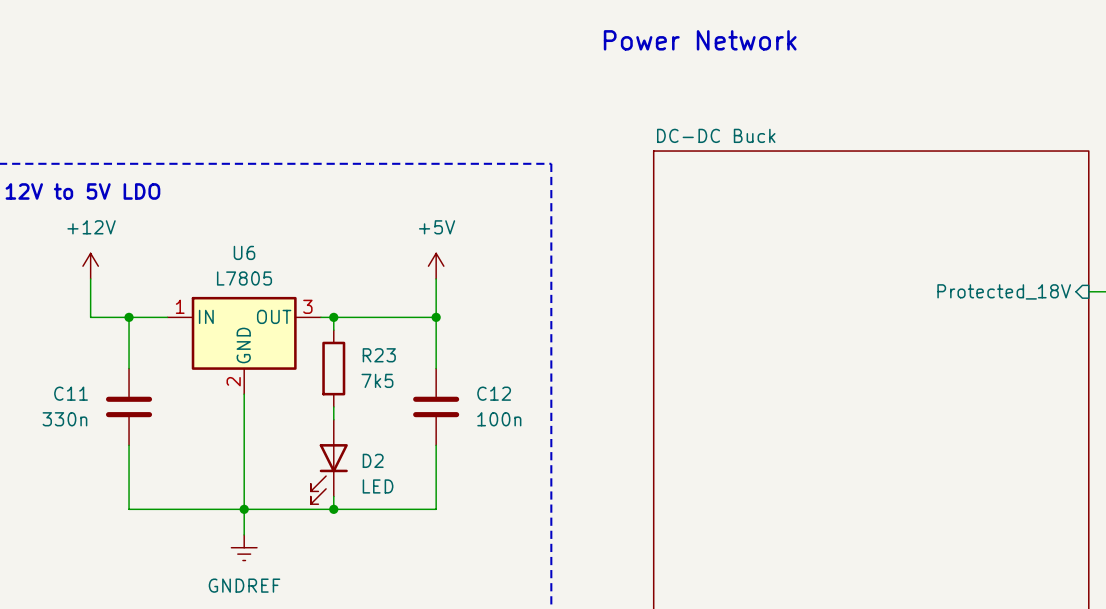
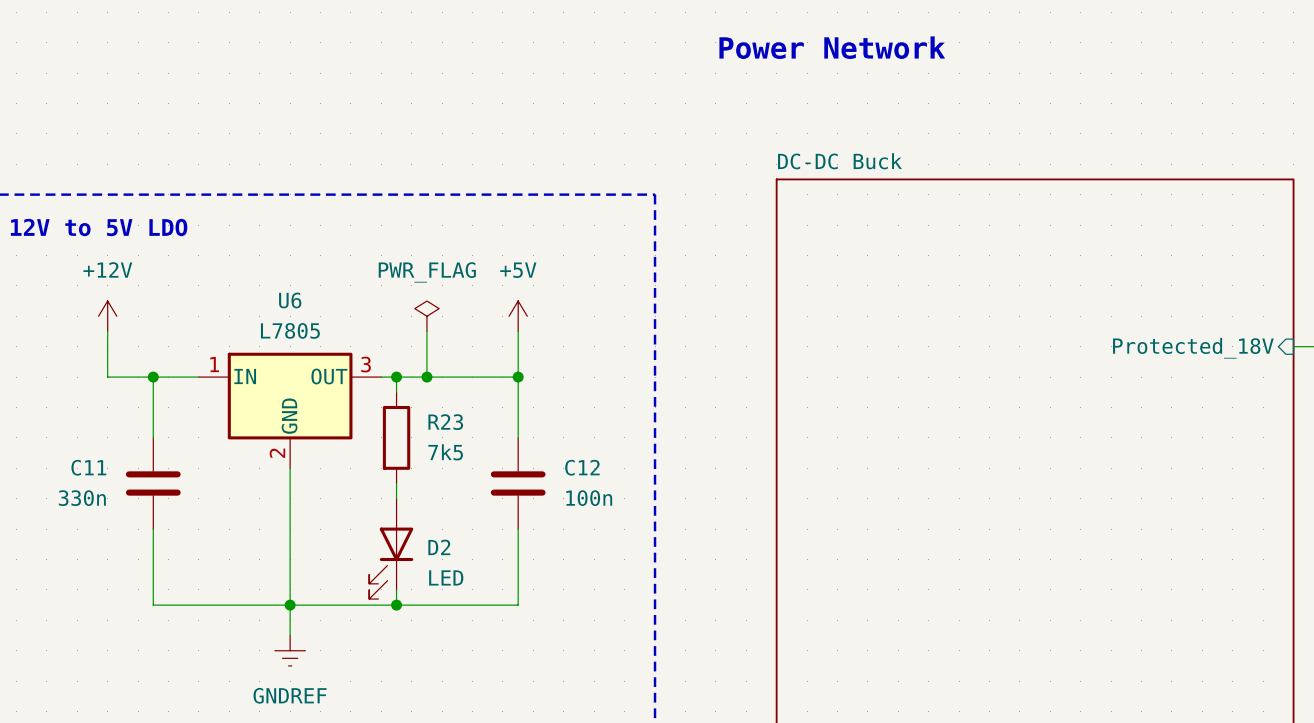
power symbol: none -> PWR_FLAG (426, 316)
wire: none -> (426, 331) (426, 377)
junction: none -> (426, 377)

